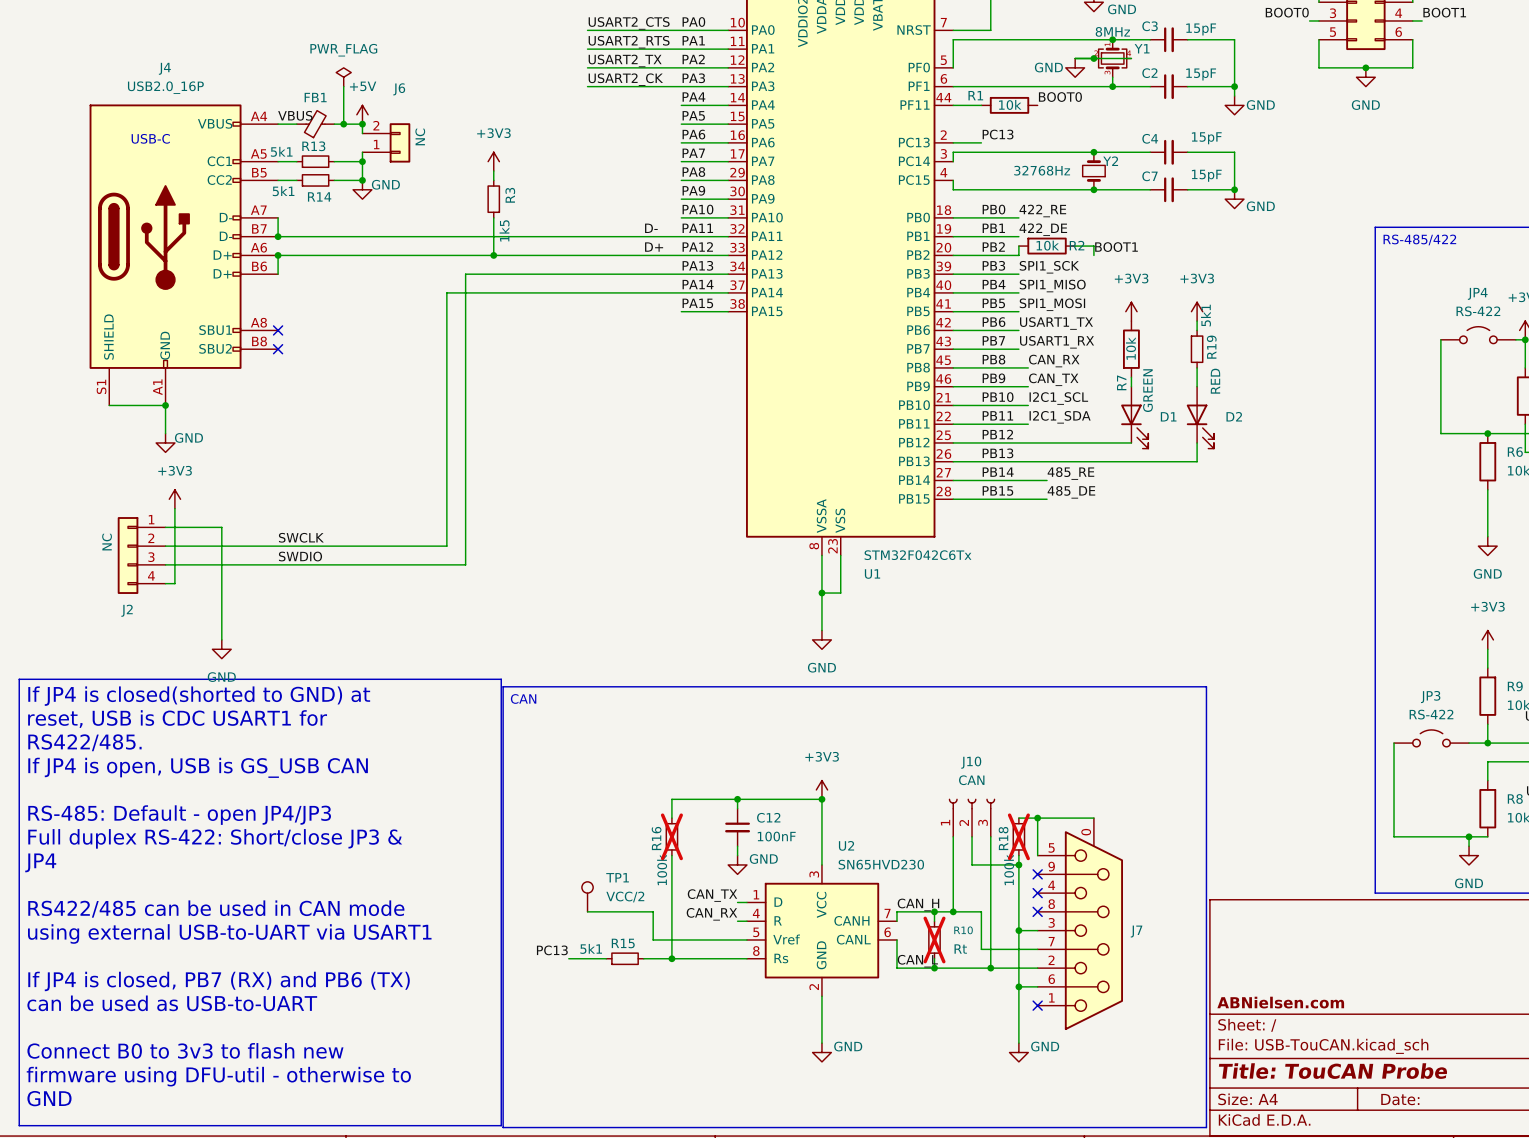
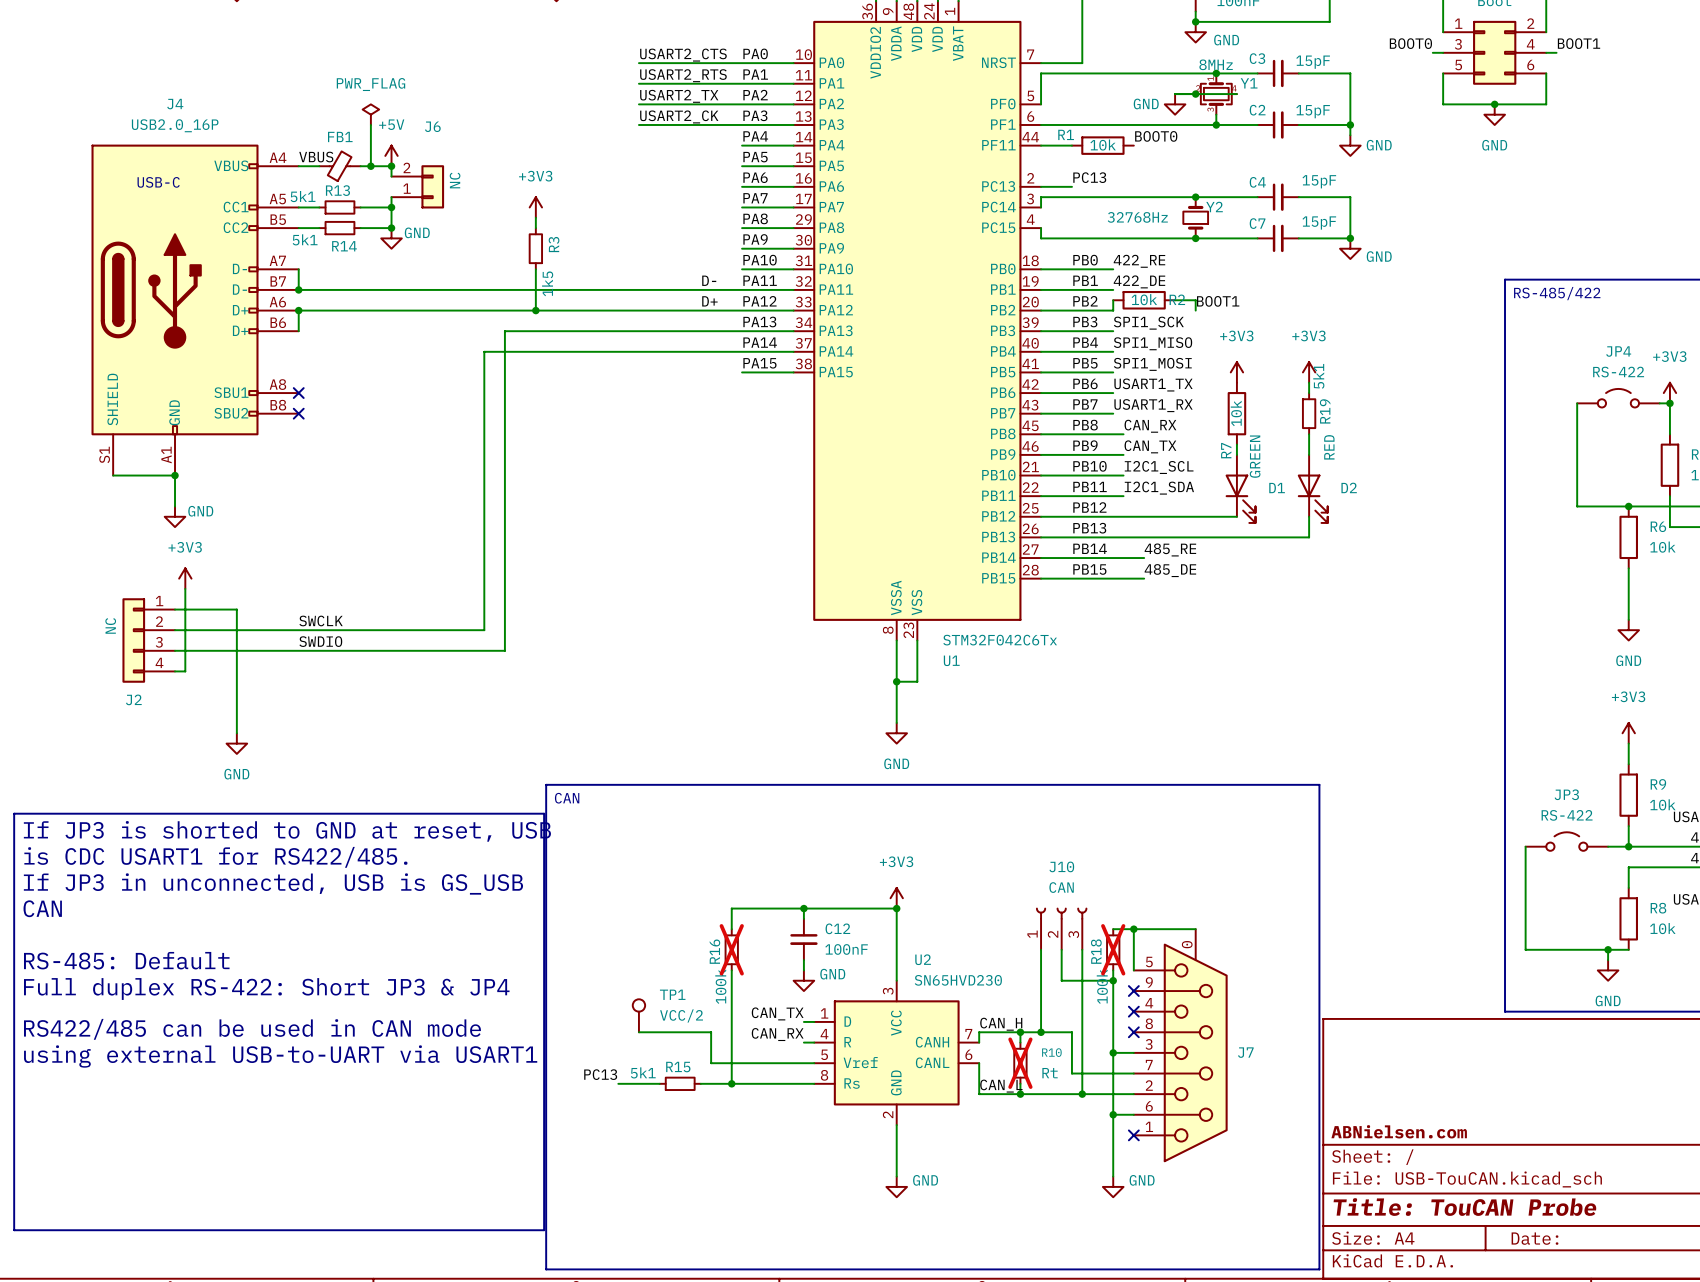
text: If JP4 is closed(shorted to GND) at (199, 696) -> none
line: (19, 713) (19, 679) (501, 679) (501, 713) -> (14, 813) (544, 813)
text: reset, USB is CDC USART1 for (177, 719) -> none
text: none -> If JP3 is shorted to GND at reset, USB (287, 831)
text: RS422/485. (84, 742) -> none
text: none -> is CDC USART1 for RS422/485. (215, 857)
text: If JP4 is open, USB is GS_USB CAN (198, 767) -> If JP3 in unconnected, USB is GS_USB (273, 883)
text: none -> CAN (42, 908)
text: RS-485: Default - open JP4/JP3 (179, 815) -> none
text: Full duplex RS-422: Short/close JP3 & (215, 838) -> none
text: none -> RS-485: Default (126, 960)
text: JP4 (40, 862) -> none
text: none -> Full duplex RS-422: Short JP3 & JP4 (266, 989)
text: If JP4 is closed, PB7 (RX) and PB6 (TX) (219, 981) -> none
text: can be used as USB-to-UART (172, 1003) -> none
text: Connect B0 to 3v3 to flash new (185, 1050) -> none
text: firmware using DFU-util - otherwise to (218, 1076) -> none
line: (19, 1091) (19, 1125) (501, 1125) (501, 1091) -> (14, 1230) (544, 1230)
text: GND (49, 1098) -> none

